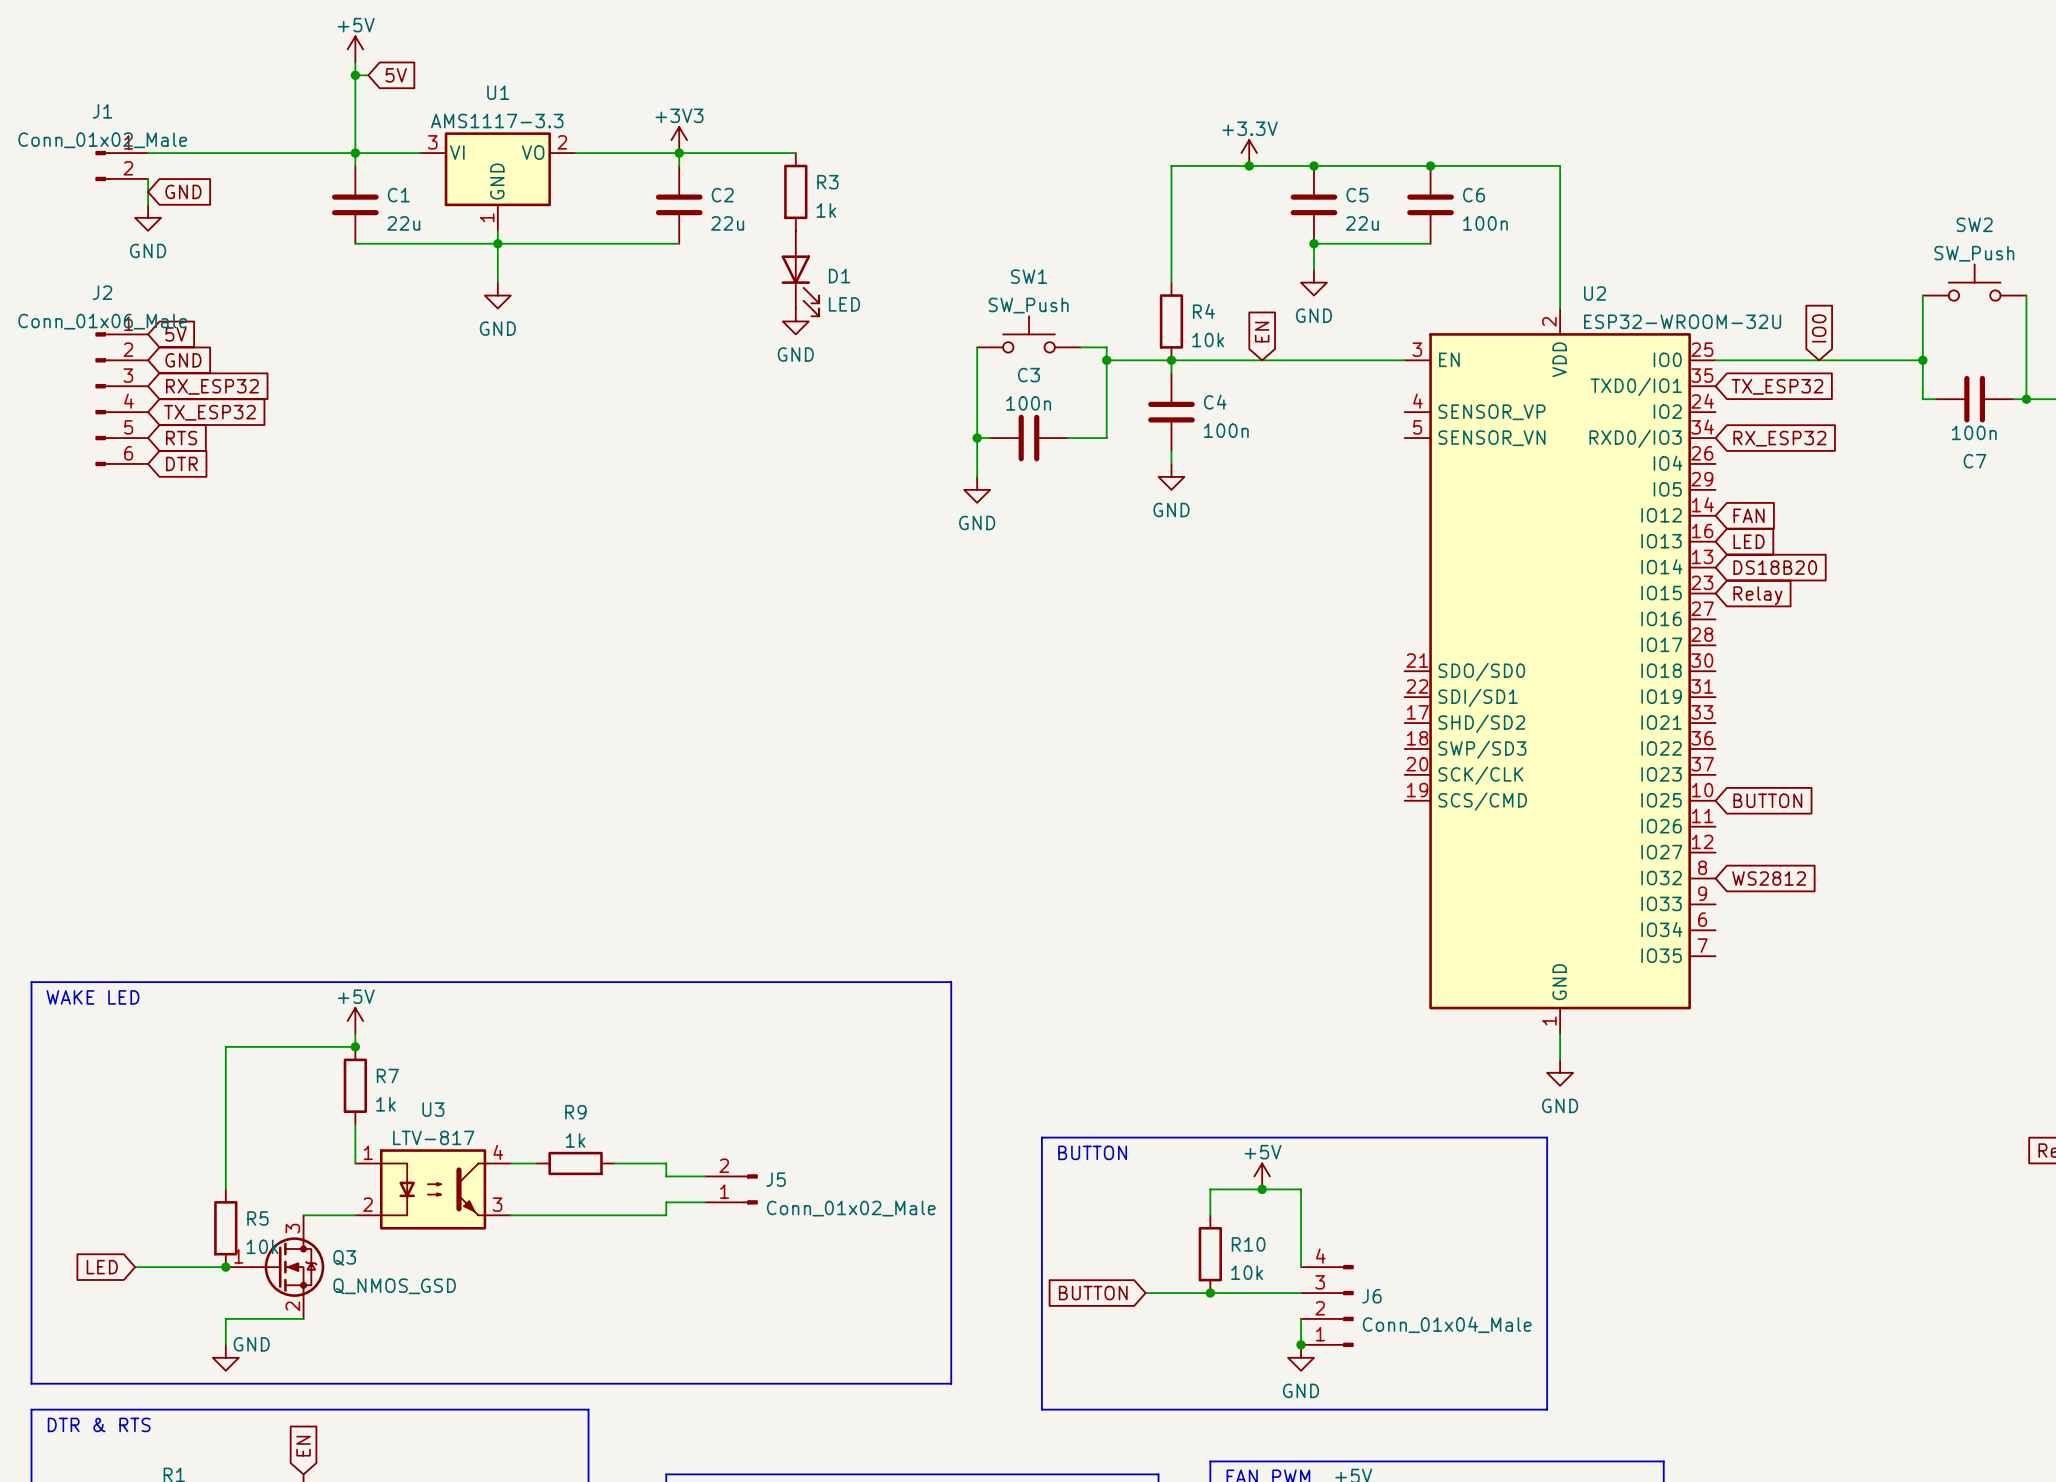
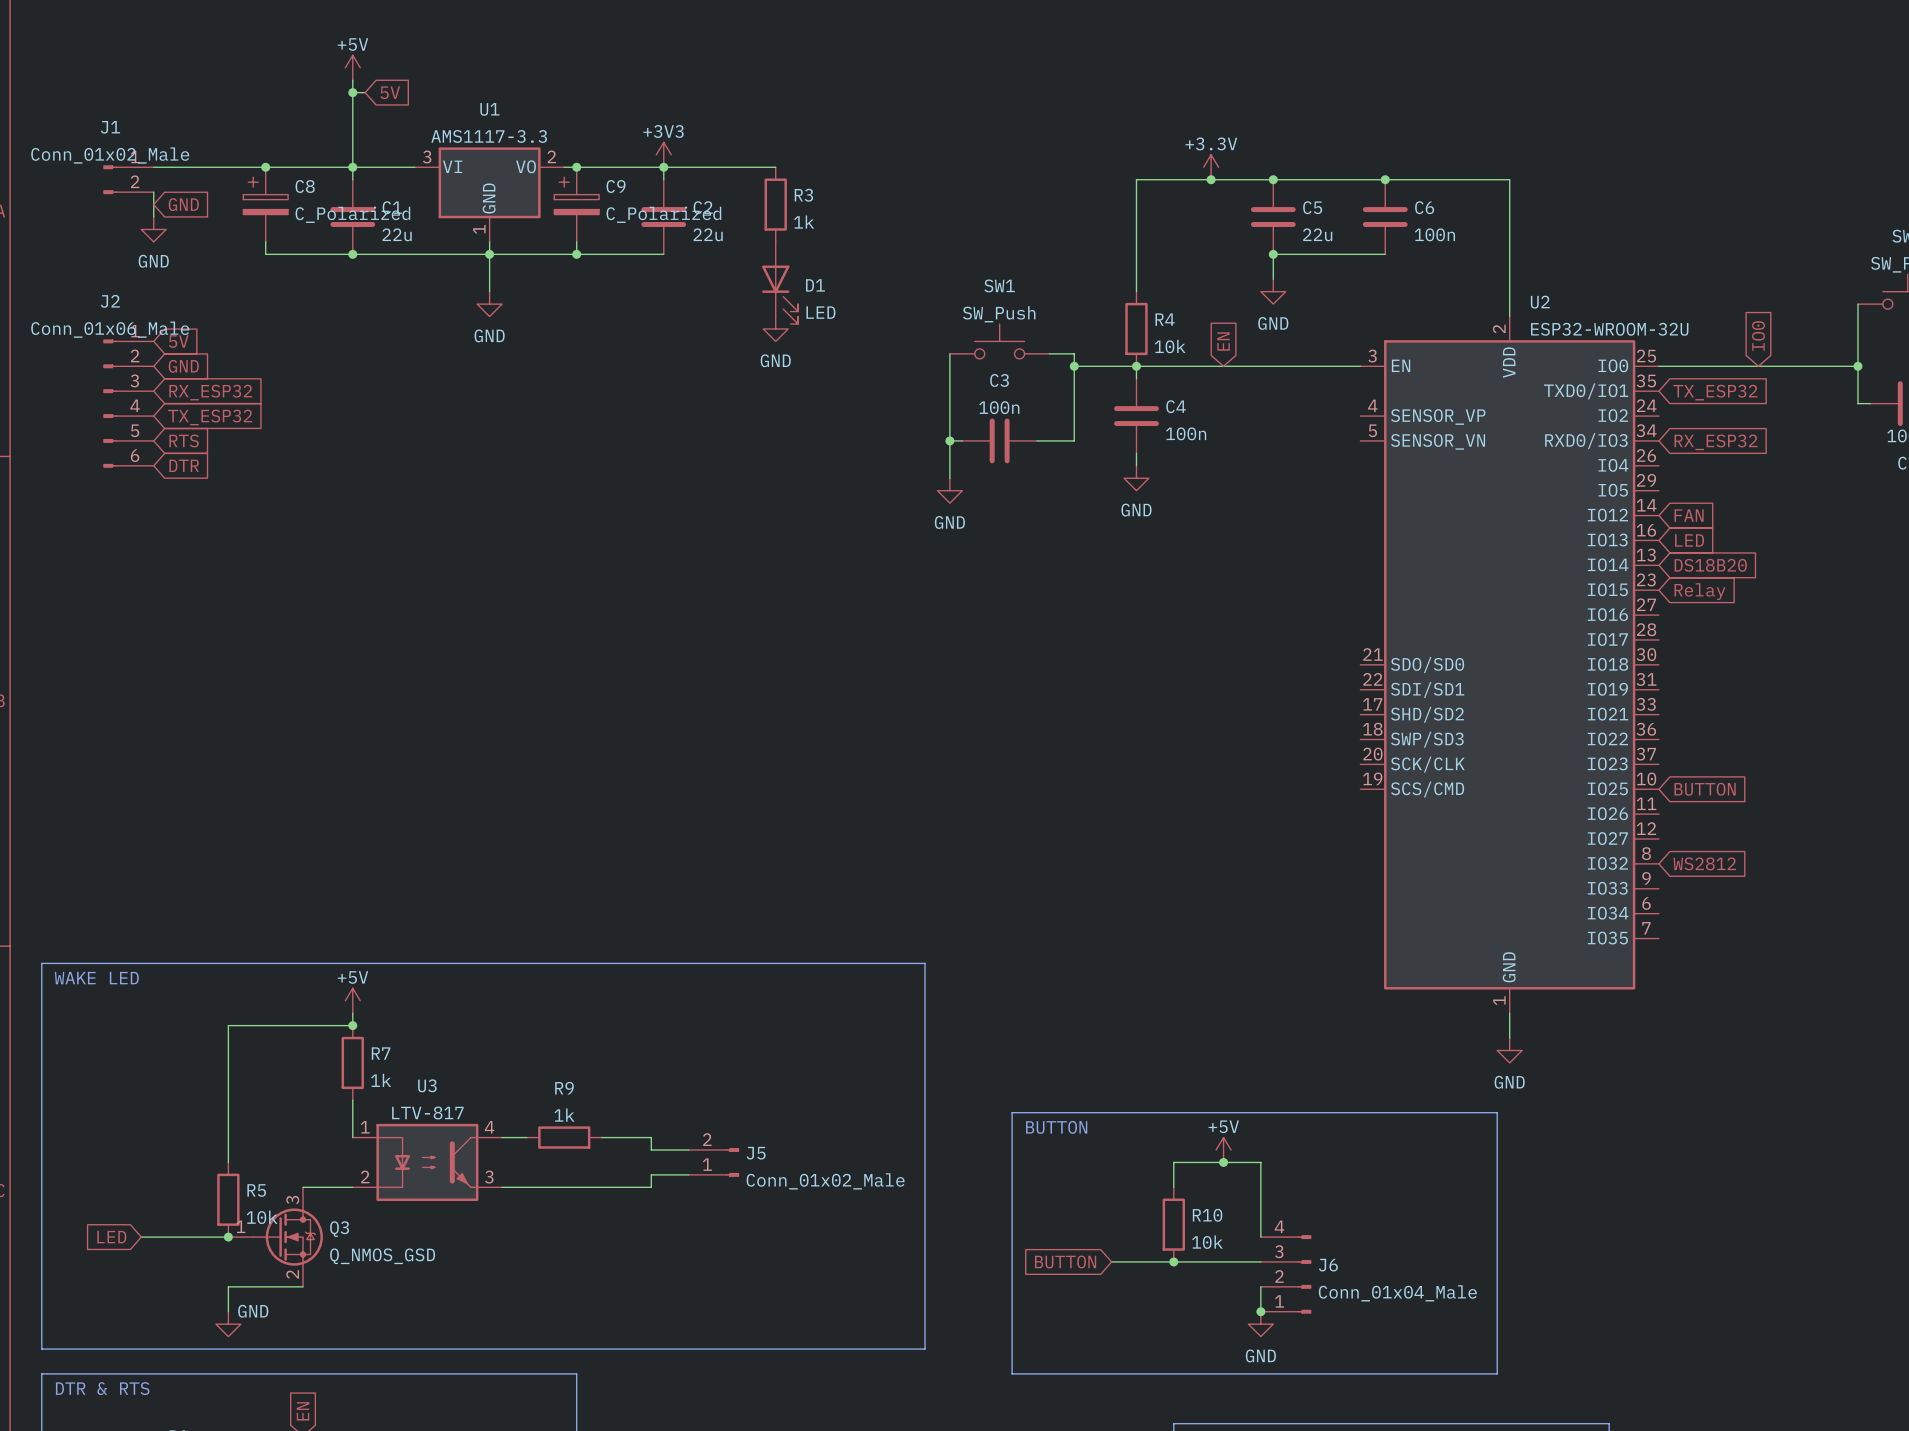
junction: none -> (265, 167)
junction: none -> (576, 167)
C8: none -> C_Polarized (265, 204)
C9: none -> C_Polarized (576, 204)
wire: none -> (265, 241) (265, 254) (352, 254)
wire: none -> (576, 241) (576, 254)
junction: none -> (352, 254)
junction: none -> (576, 254)

